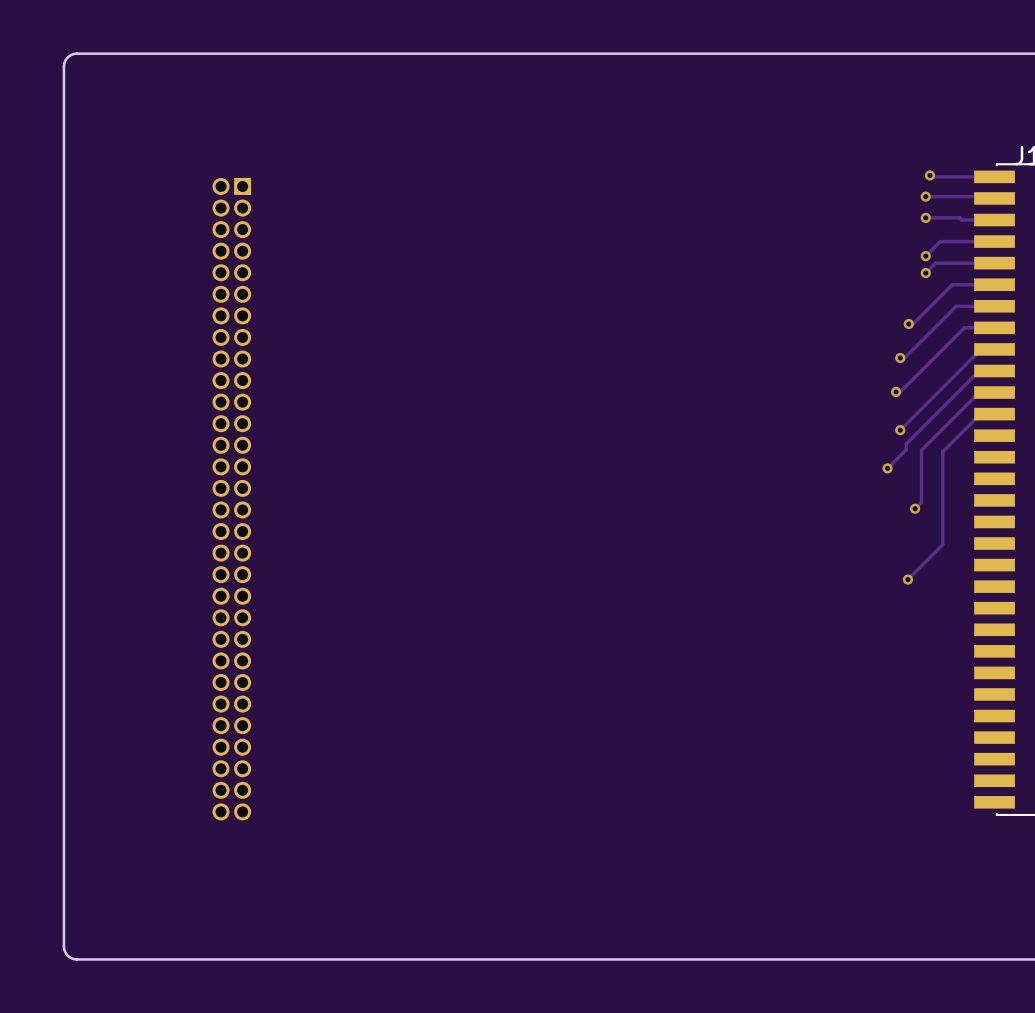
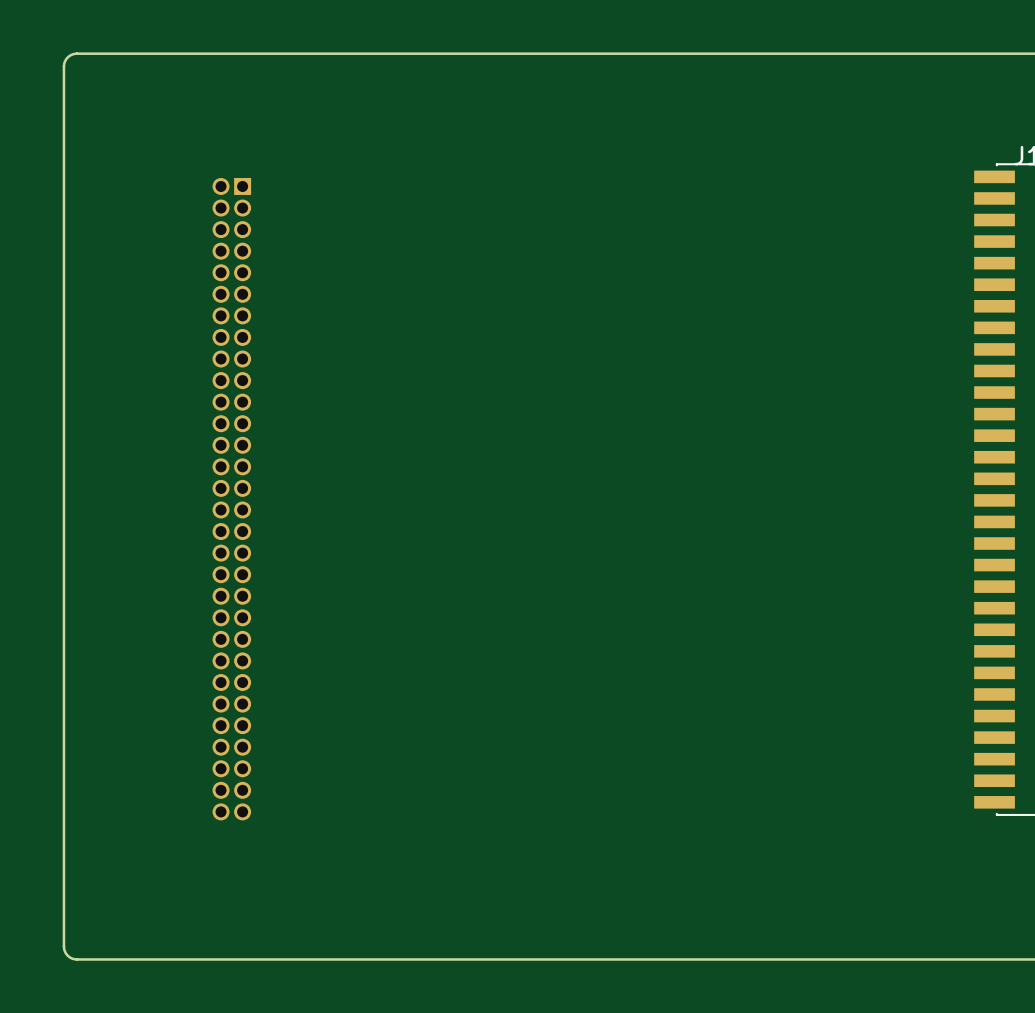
track: (930, 175) (994, 176) -> none
via: (930, 175) -> none
track: (925, 196) (992, 196) (994, 198) -> none
via: (925, 196) -> none
track: (925, 217) (994, 220) -> none
via: (925, 217) -> none
track: (994, 241) (940, 241) (925, 256) -> none
via: (925, 256) -> none
track: (994, 263) (935, 263) (925, 273) -> none
via: (925, 273) -> none
track: (994, 284) (952, 284) (913, 324) (908, 324) -> none
track: (994, 306) (956, 306) (904, 357) (900, 357) -> none
via: (908, 324) -> none
track: (994, 327) (964, 327) (900, 391) (896, 391) -> none
track: (994, 349) (981, 349) (900, 430) -> none
via: (900, 357) -> none
track: (994, 370) (979, 370) (906, 443) (906, 449) (887, 468) -> none
via: (896, 391) -> none
track: (994, 392) (979, 392) (921, 450) (921, 502) (915, 508) -> none
track: (994, 414) (980, 414) (942, 451) (942, 544) (907, 579) -> none
via: (900, 430) -> none
via: (887, 468) -> none
via: (915, 508) -> none
via: (907, 579) -> none

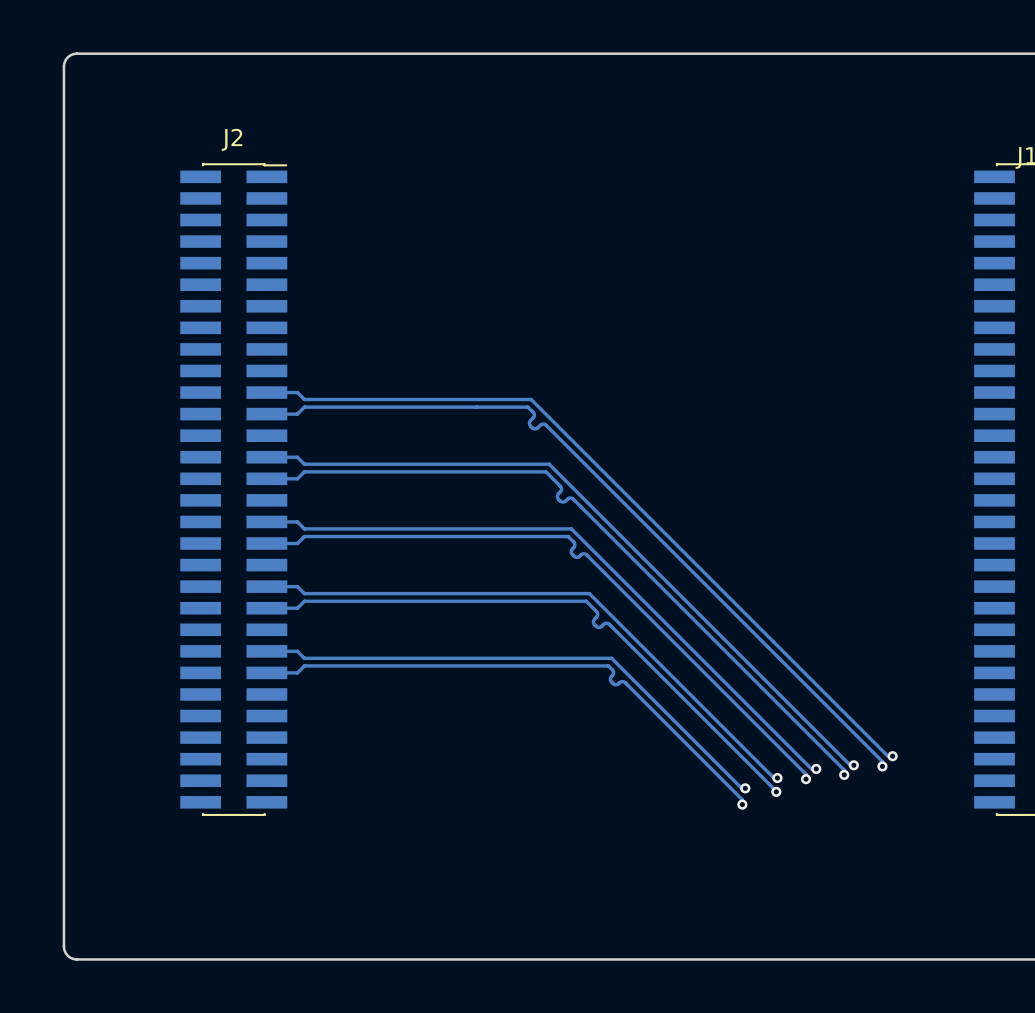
track: none -> (266, 392) (297, 392) (304, 399) (531, 399) (887, 756) (892, 756)
track: none -> (266, 414) (297, 414) (304, 407) (528, 407) (534, 414) (529, 422) (530, 426) (535, 428) (541, 424) (546, 425) (882, 761) (882, 766)
track: none -> (266, 457) (297, 457) (304, 464) (549, 464) (850, 765) (853, 765)
track: none -> (266, 478) (297, 478) (304, 471) (546, 471) (561, 487) (557, 495) (558, 499) (562, 502) (569, 498) (573, 499) (844, 770) (844, 774)
J2: none -> (233, 489)
part: (231, 499) -> none
track: none -> (266, 521) (297, 521) (304, 528) (571, 528) (811, 768) (816, 768)
track: none -> (266, 543) (297, 543) (304, 536) (568, 536) (574, 543) (571, 550) (572, 554) (576, 557) (582, 553) (586, 554) (806, 774) (806, 779)
track: none -> (266, 586) (297, 586) (304, 593) (589, 593) (773, 778) (777, 778)
track: none -> (266, 608) (297, 608) (304, 601) (586, 601) (597, 613) (593, 621) (594, 624) (598, 627) (605, 623) (609, 624) (776, 791)
track: none -> (266, 651) (297, 651) (304, 658) (611, 658) (741, 788) (745, 788)
track: none -> (266, 672) (297, 672) (304, 665) (608, 665) (613, 671) (610, 678) (611, 682) (615, 684) (621, 681) (625, 682) (742, 799) (742, 804)
via: none -> (892, 756)
via: none -> (853, 765)
via: none -> (882, 766)
via: none -> (816, 768)
via: none -> (844, 774)
via: none -> (777, 778)
via: none -> (806, 779)
via: none -> (745, 788)
via: none -> (776, 791)
via: none -> (742, 804)

